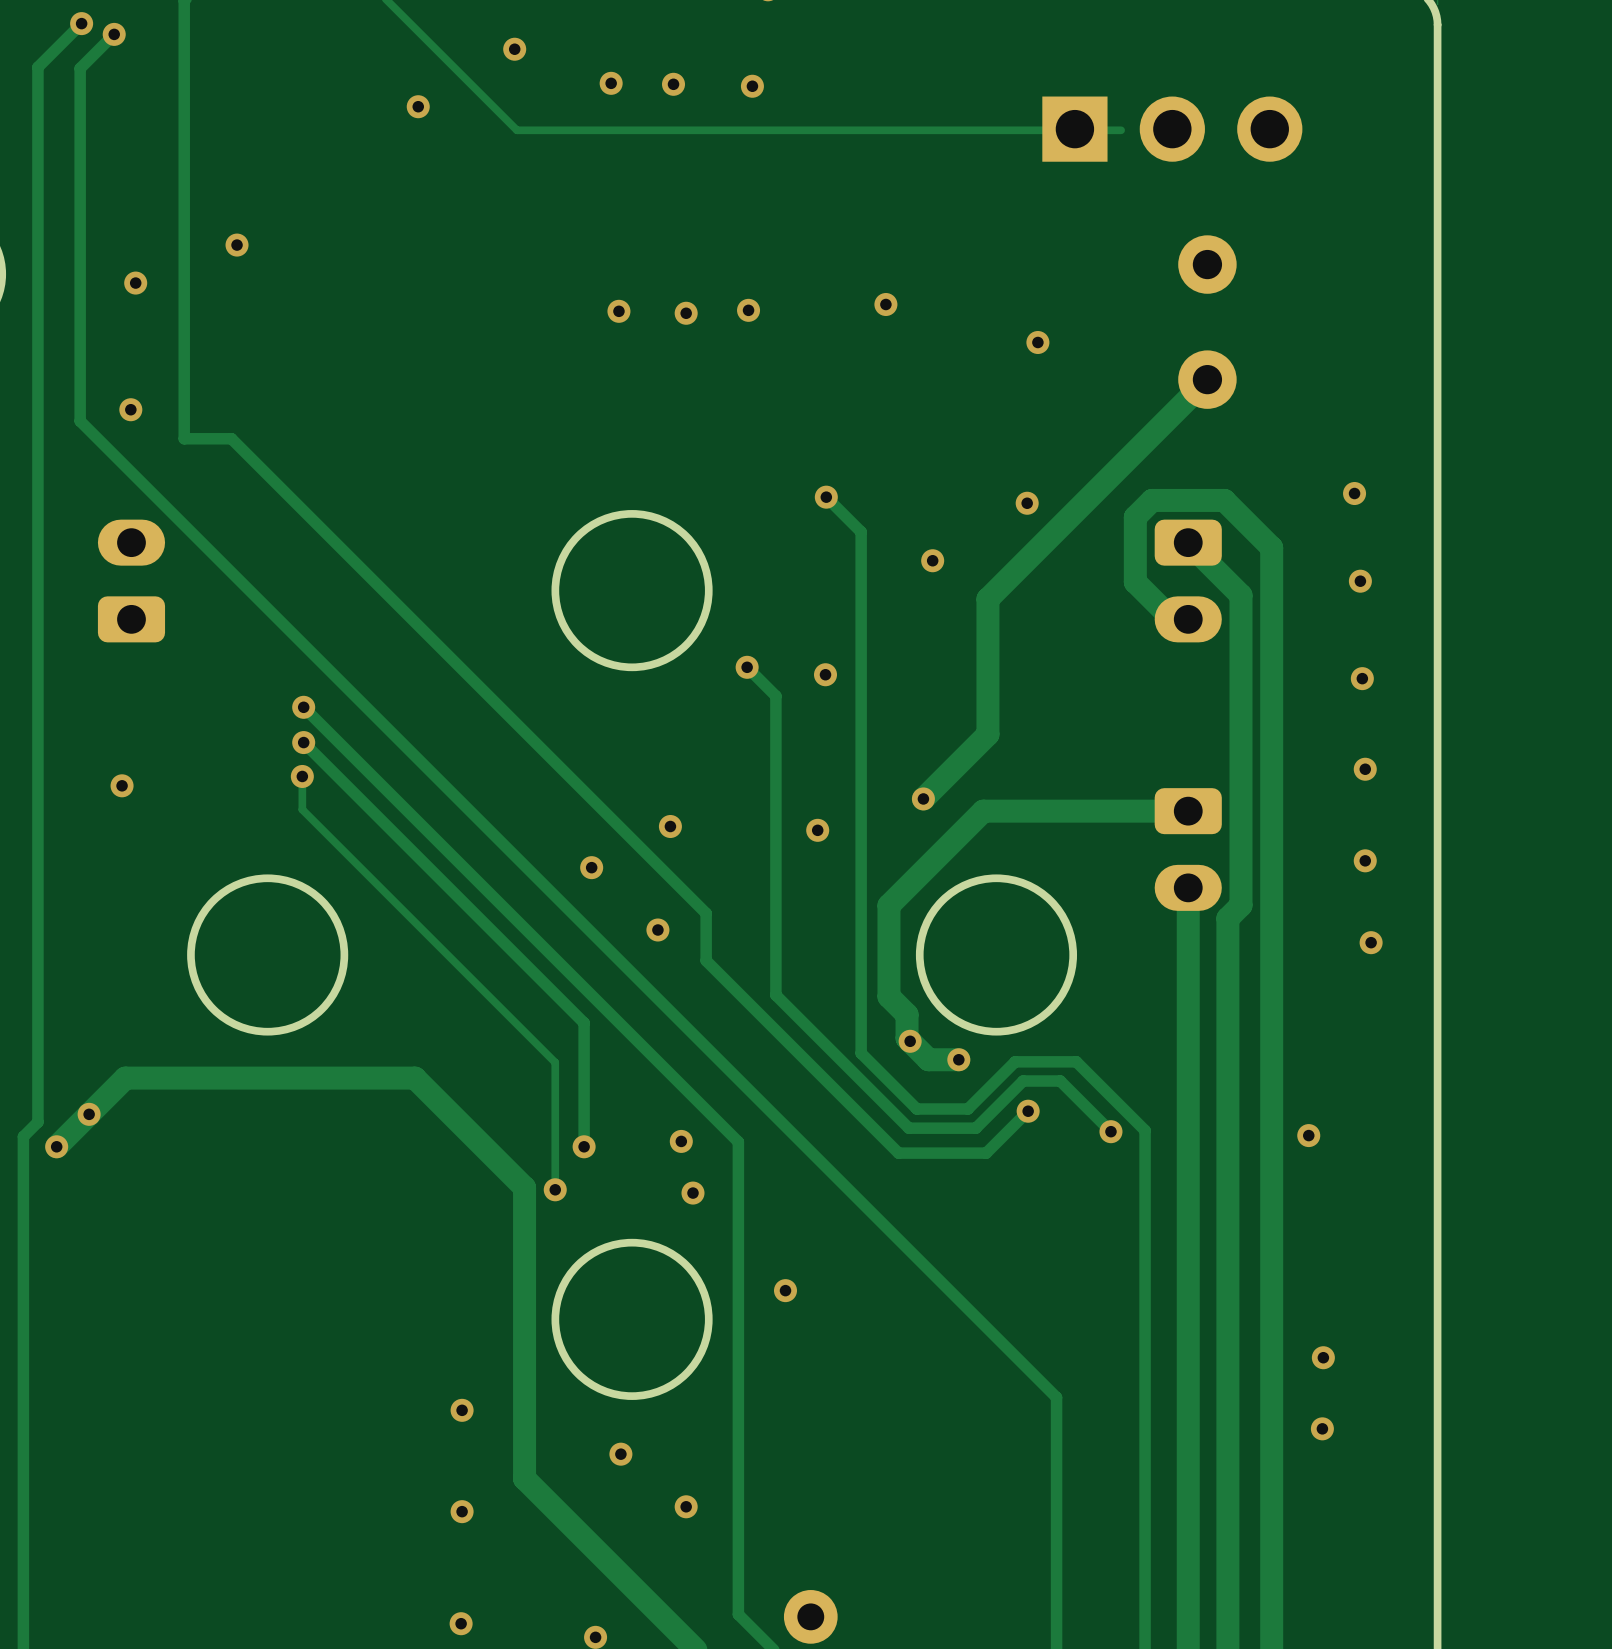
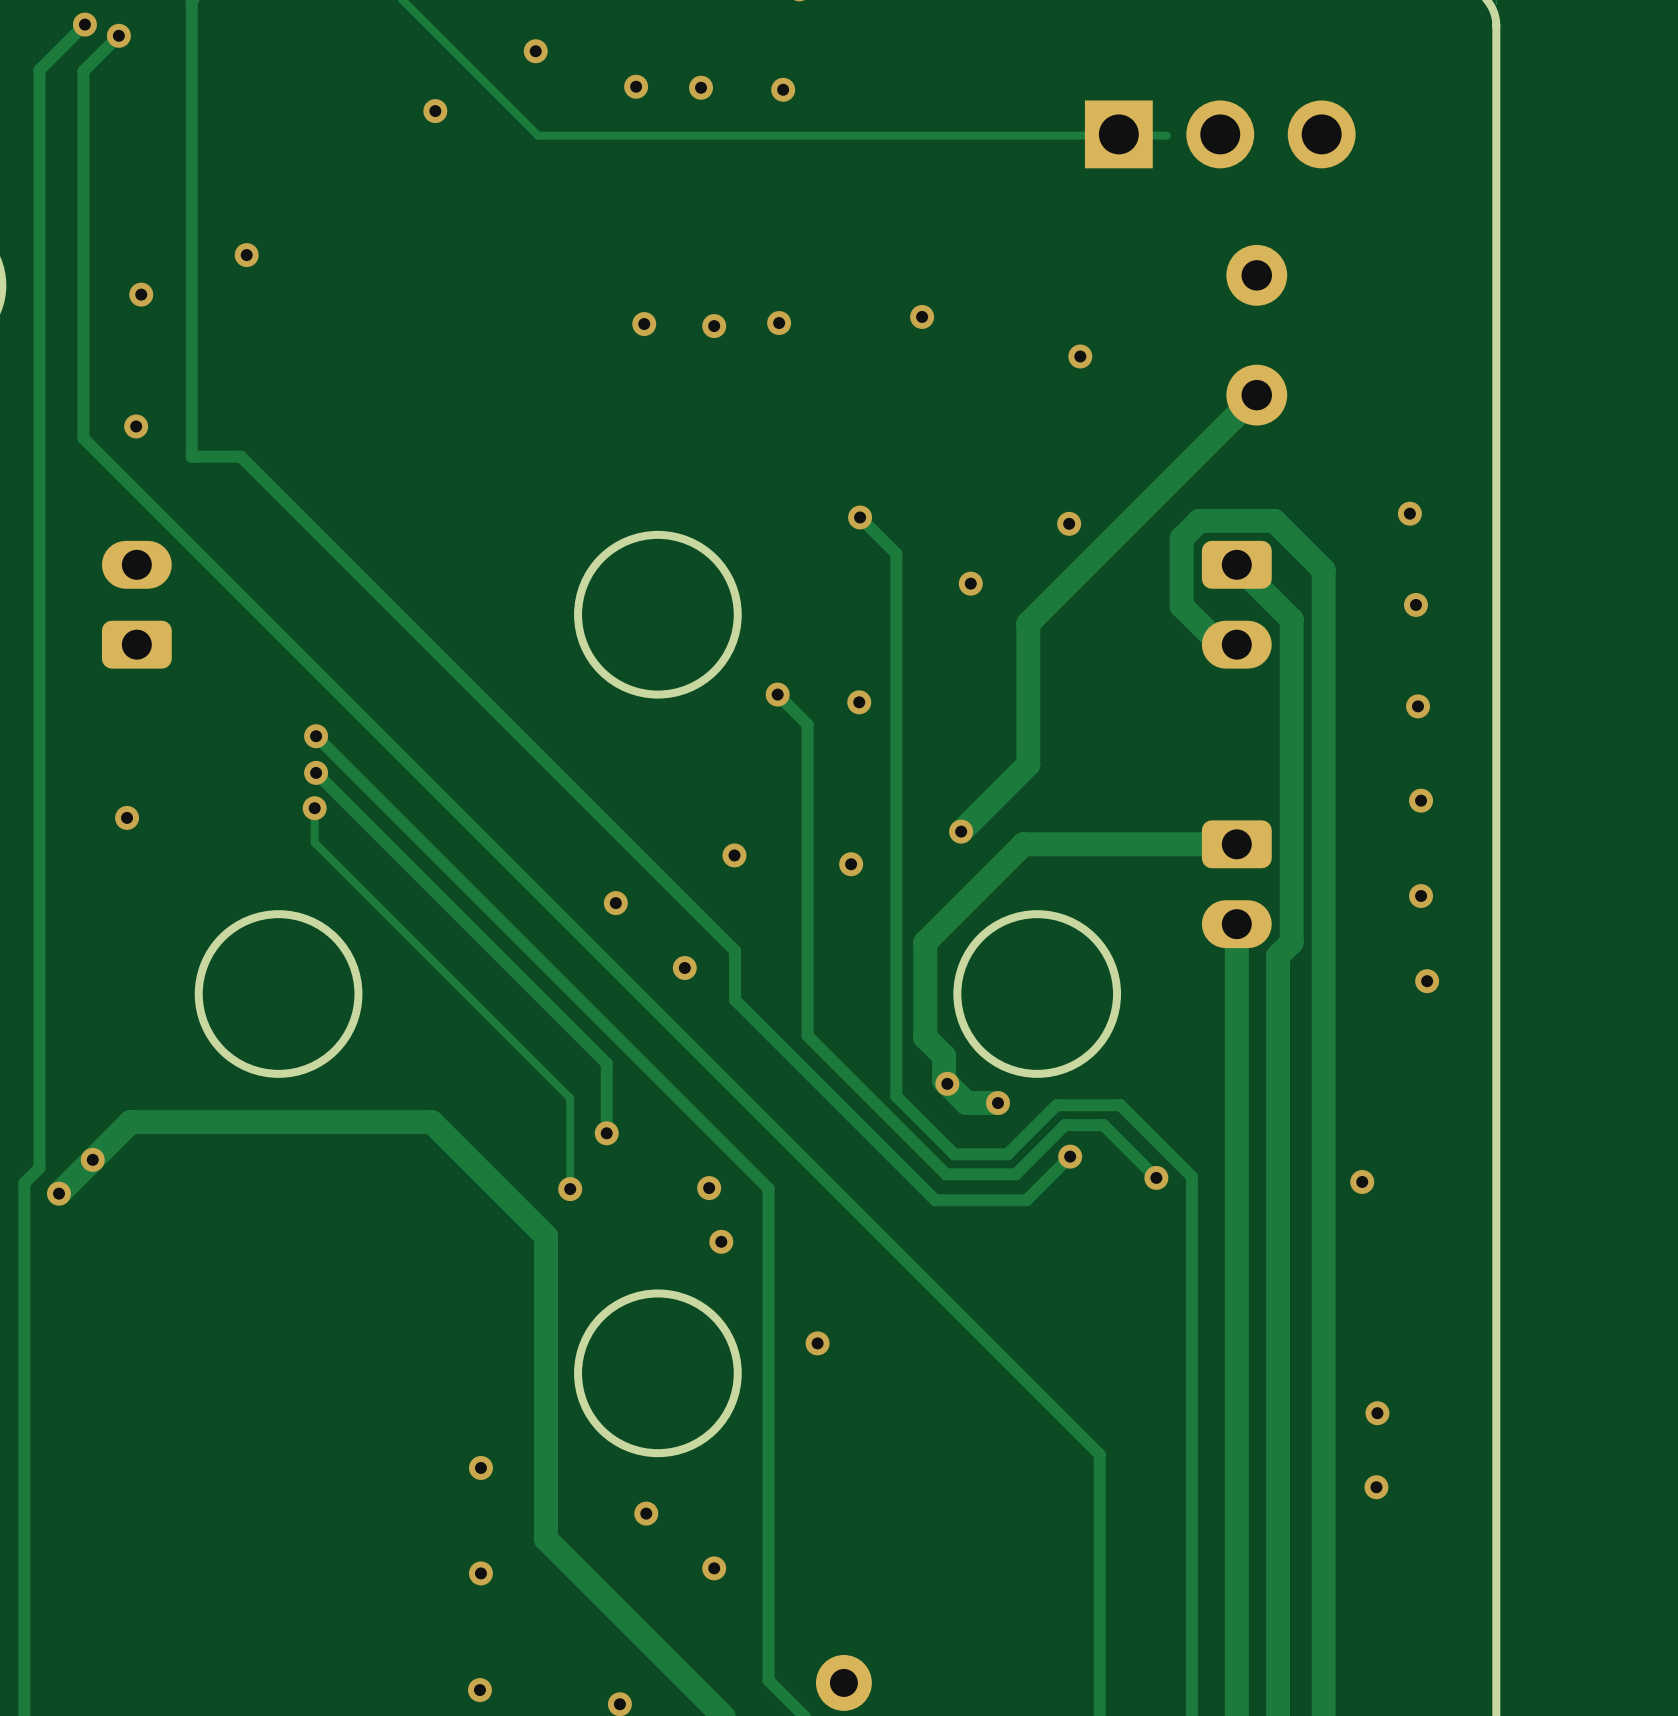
via position: (670, 826) -> (734, 855)
track: (582, 1021) (584, 1146) -> (606, 1063) (606, 1133)
track: (547, 1055) (555, 1062) (555, 1189) -> (570, 1098) (570, 1189)
via: none -> (606, 1133)
via: none -> (570, 1189)
via: (584, 1146) -> none
via: (555, 1189) -> none

